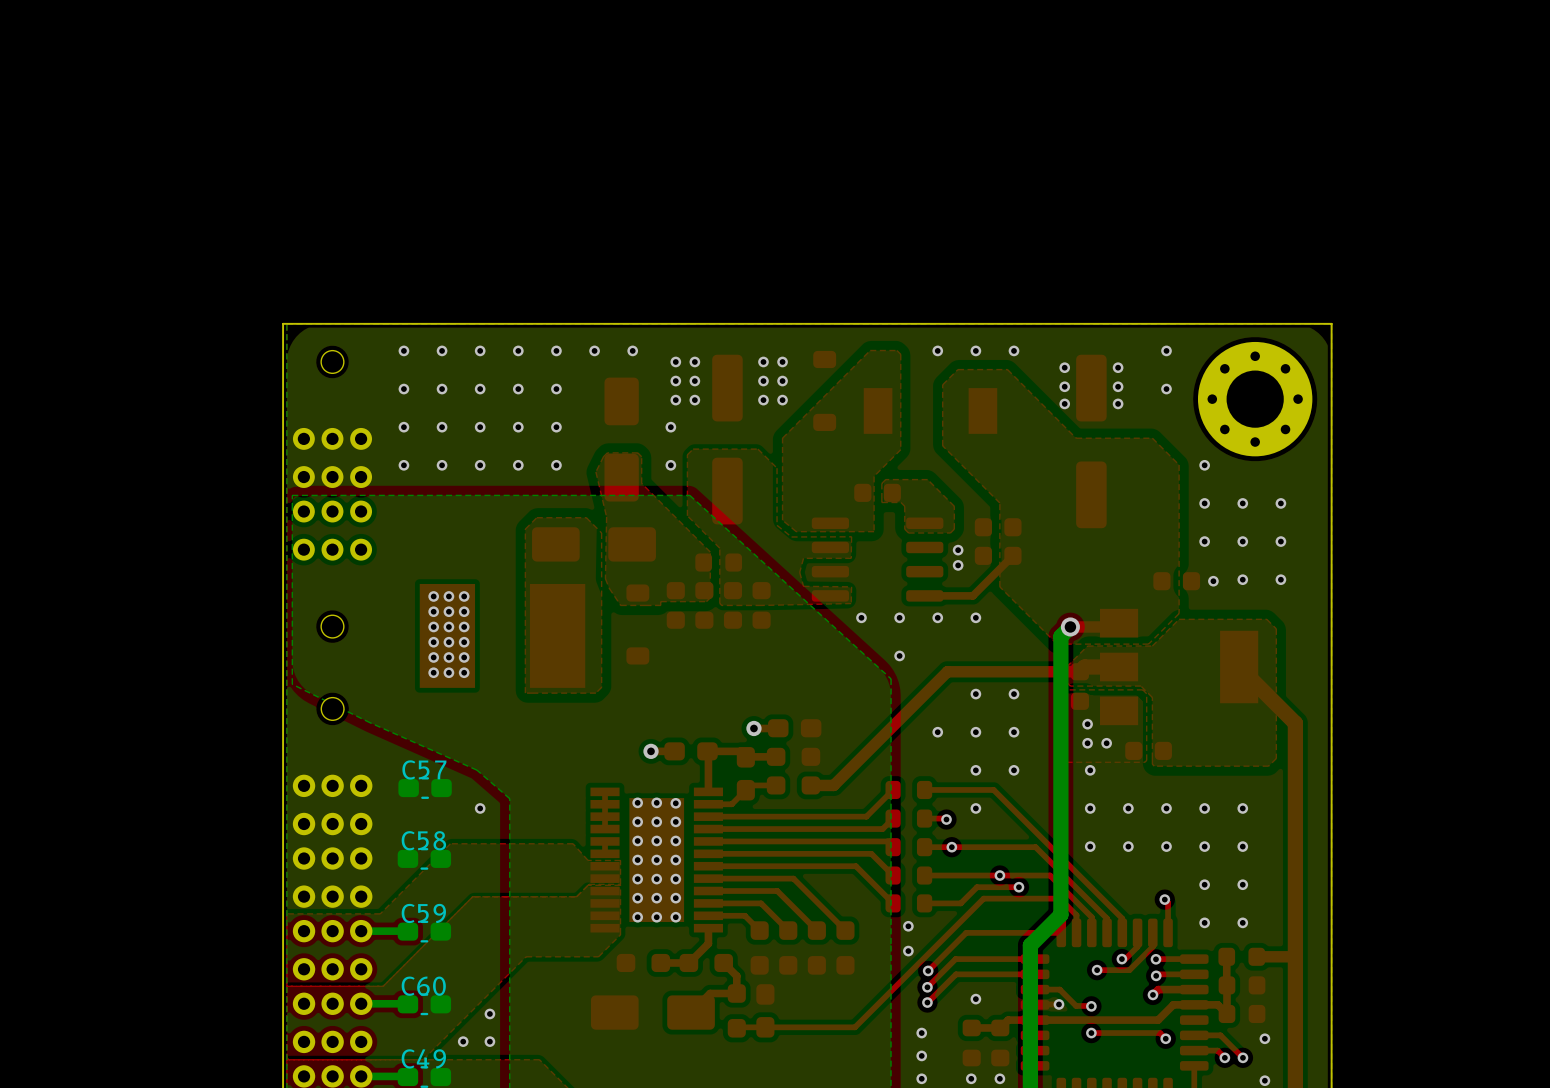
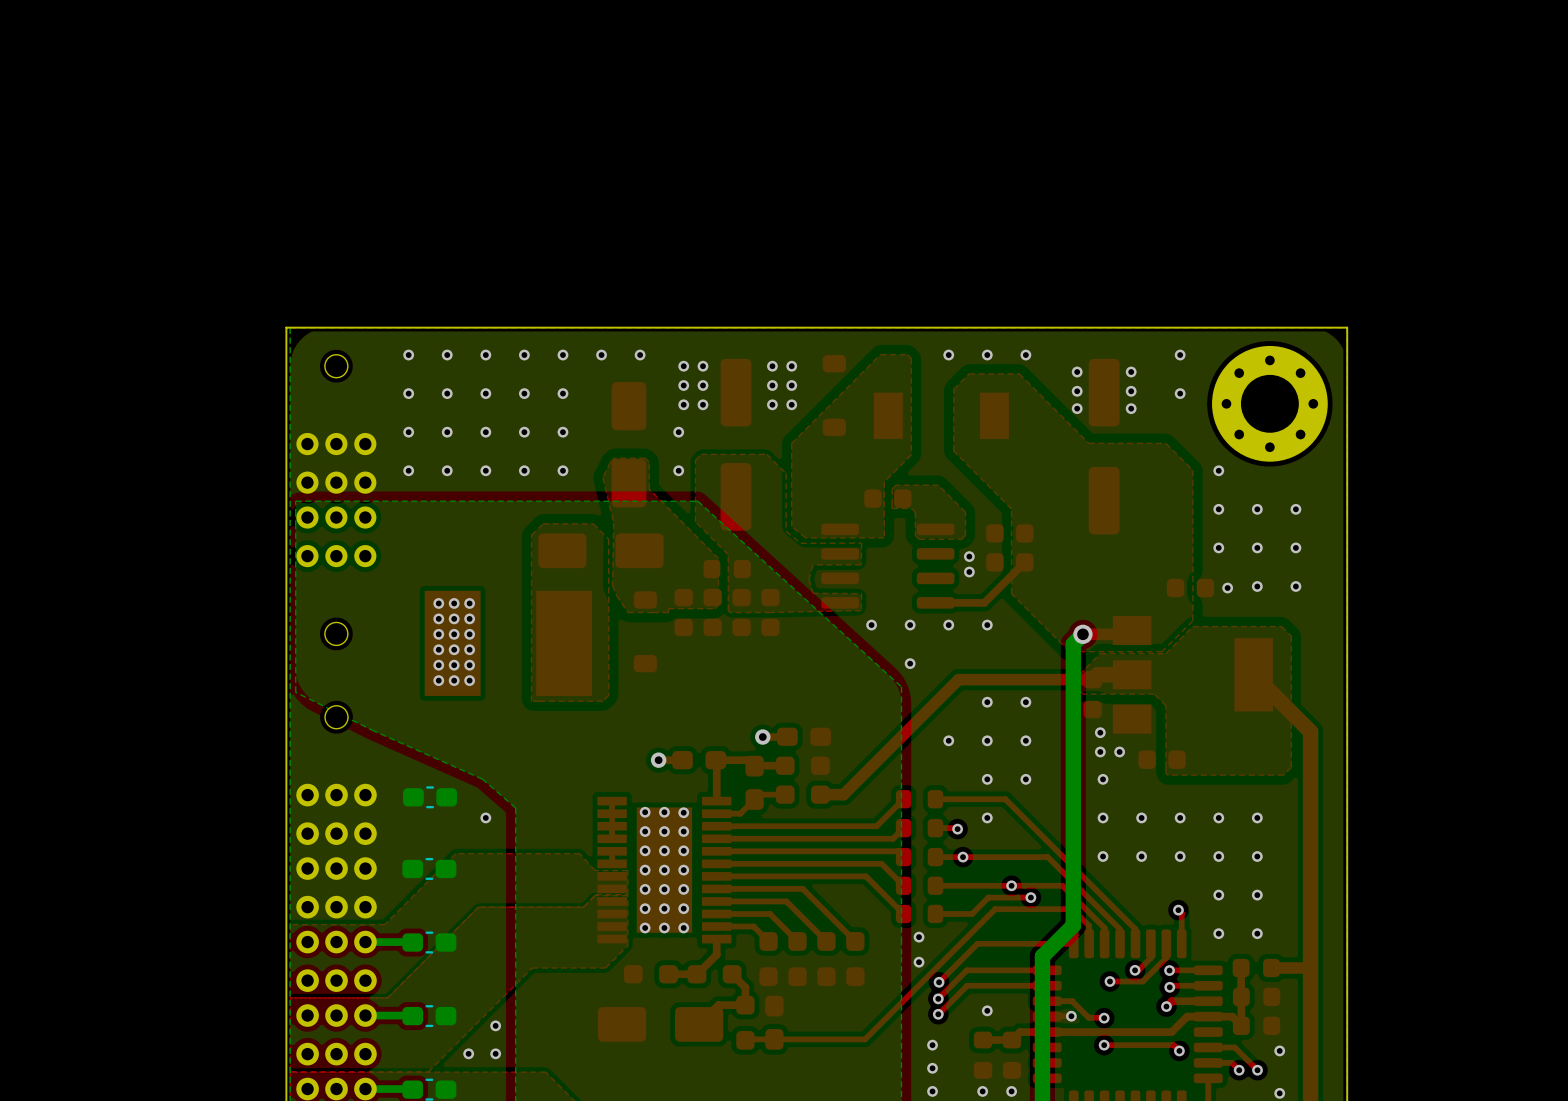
top zone outline: (1142, 689) (1146, 693) (1146, 760) (1144, 762) (1066, 762) (1066, 689) (1142, 689) -> none
C57 name: C57 (424, 769) -> none
C58 name: C58 (423, 840) -> none
C59 name: C59 (423, 913) -> none
C60 name: C60 (423, 986) -> none
C49 name: C49 (423, 1058) -> none

